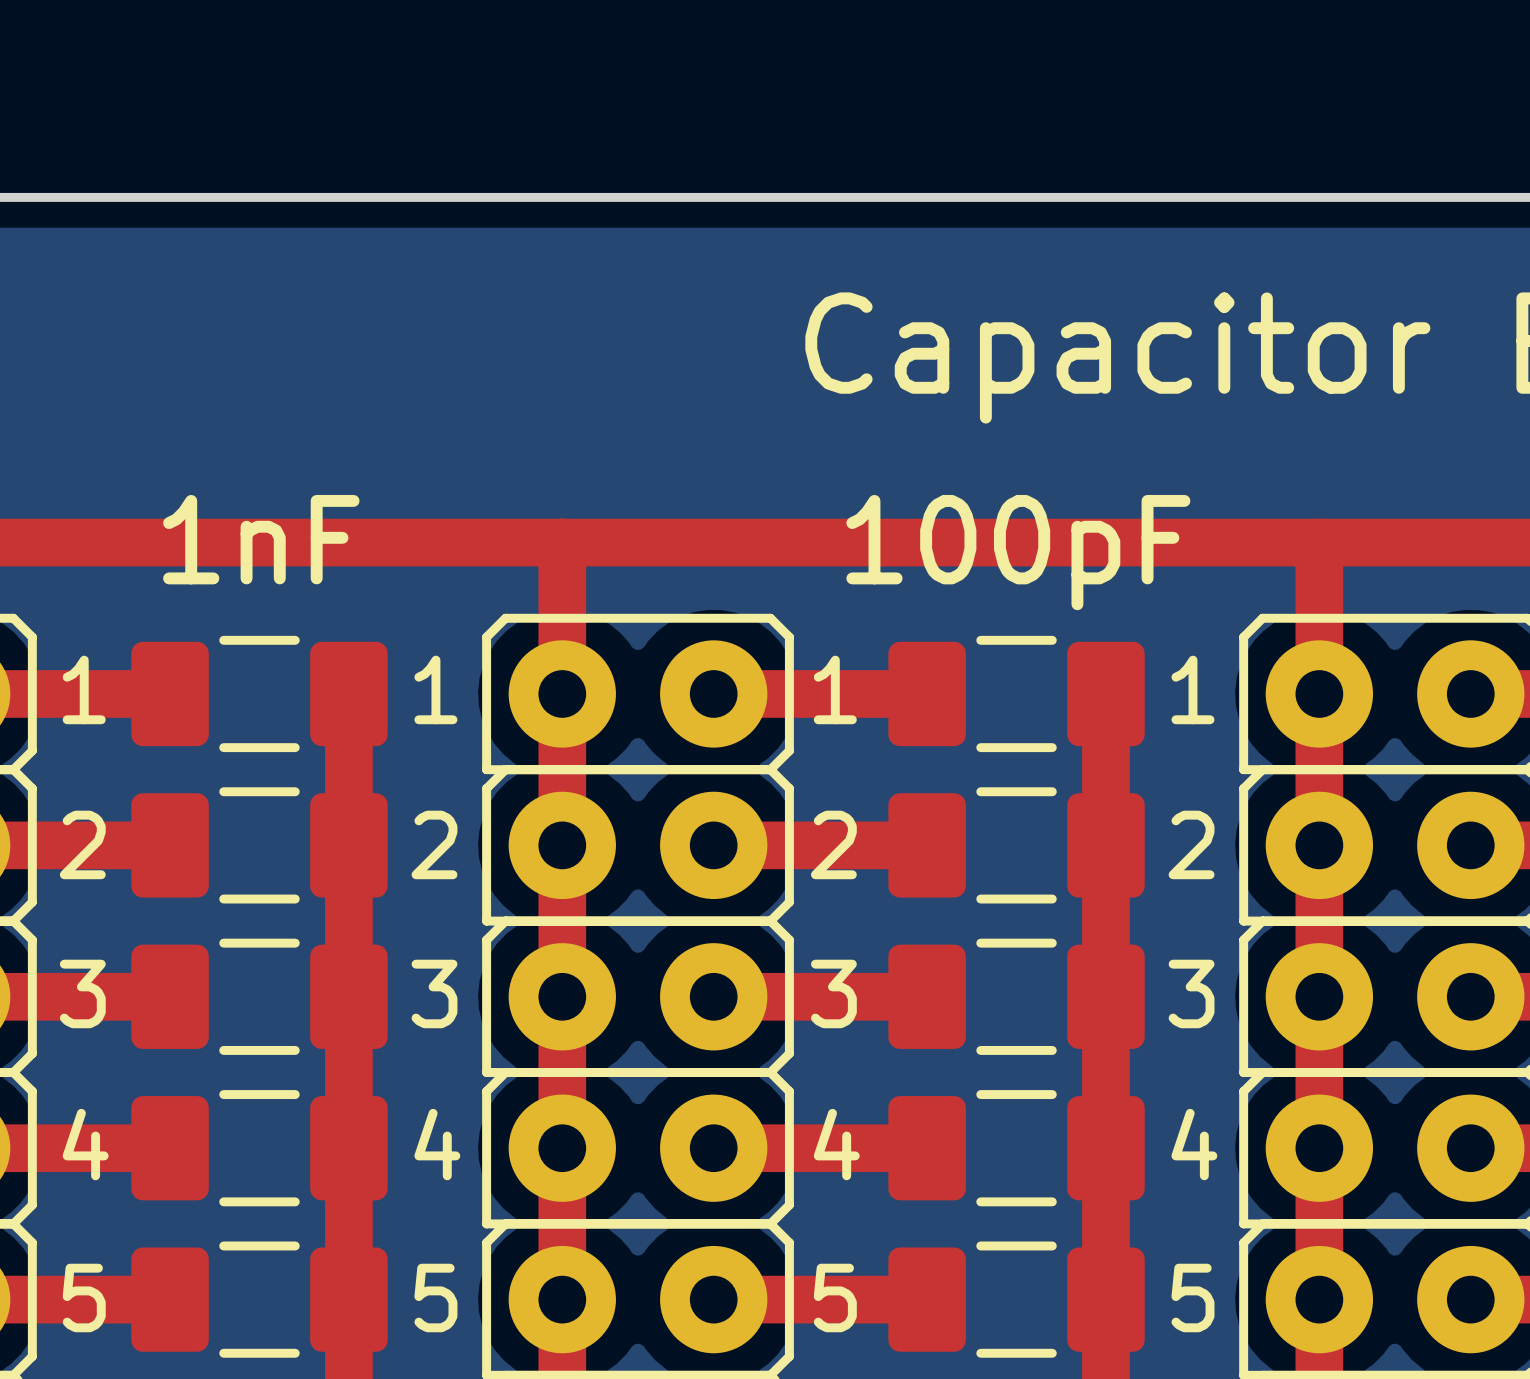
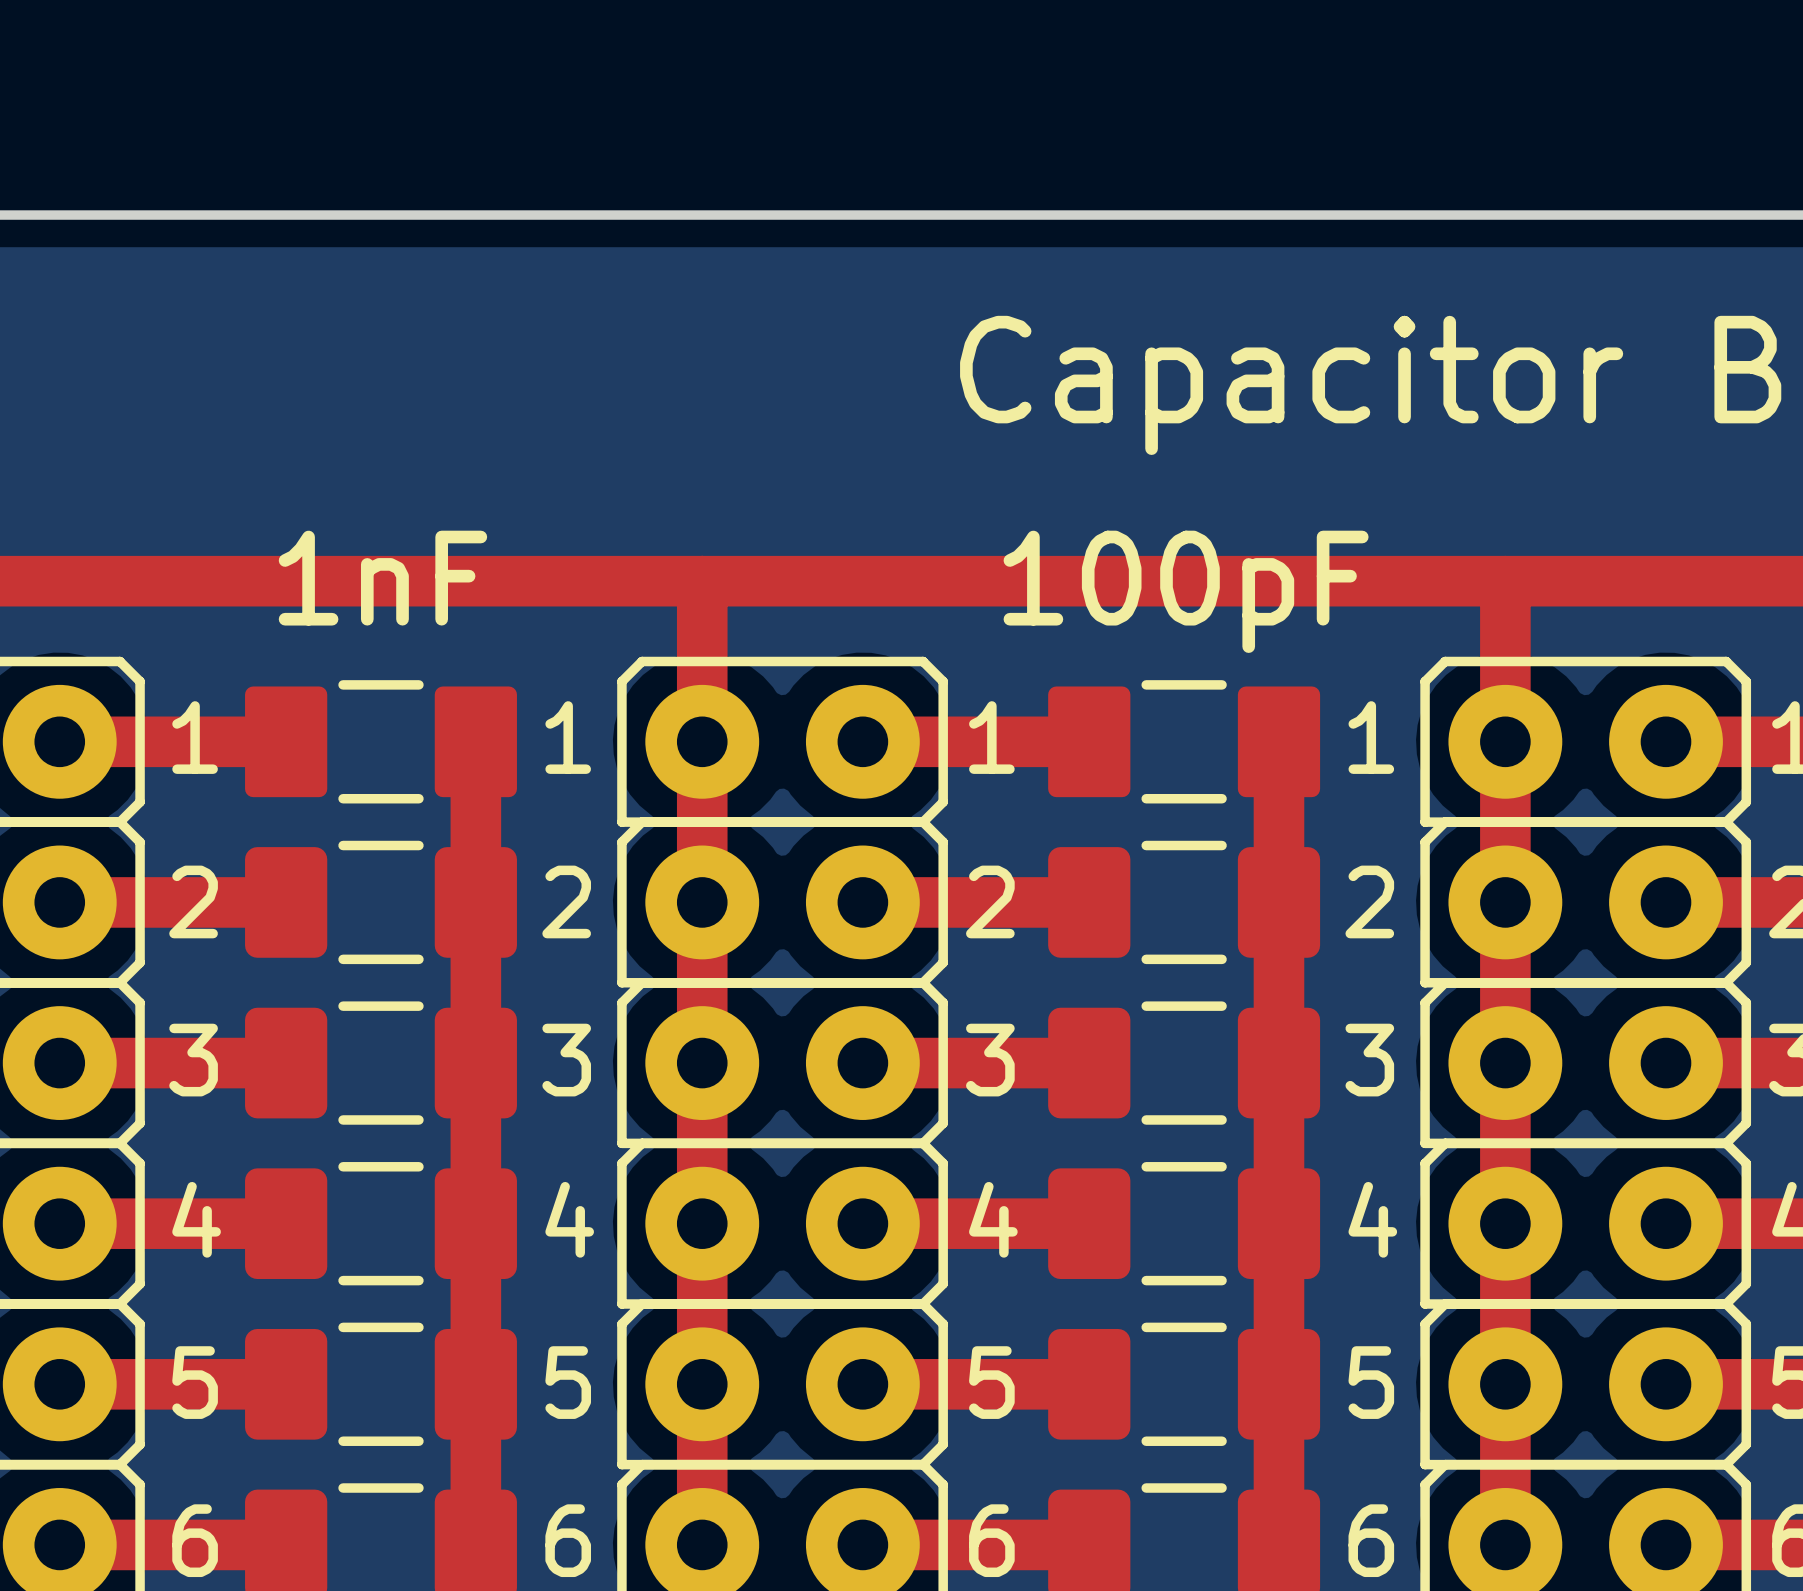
part footprint: [131, 635, 388, 753] -> [245, 680, 517, 804]
part footprint: [888, 635, 1145, 753] -> [1048, 680, 1321, 804]

